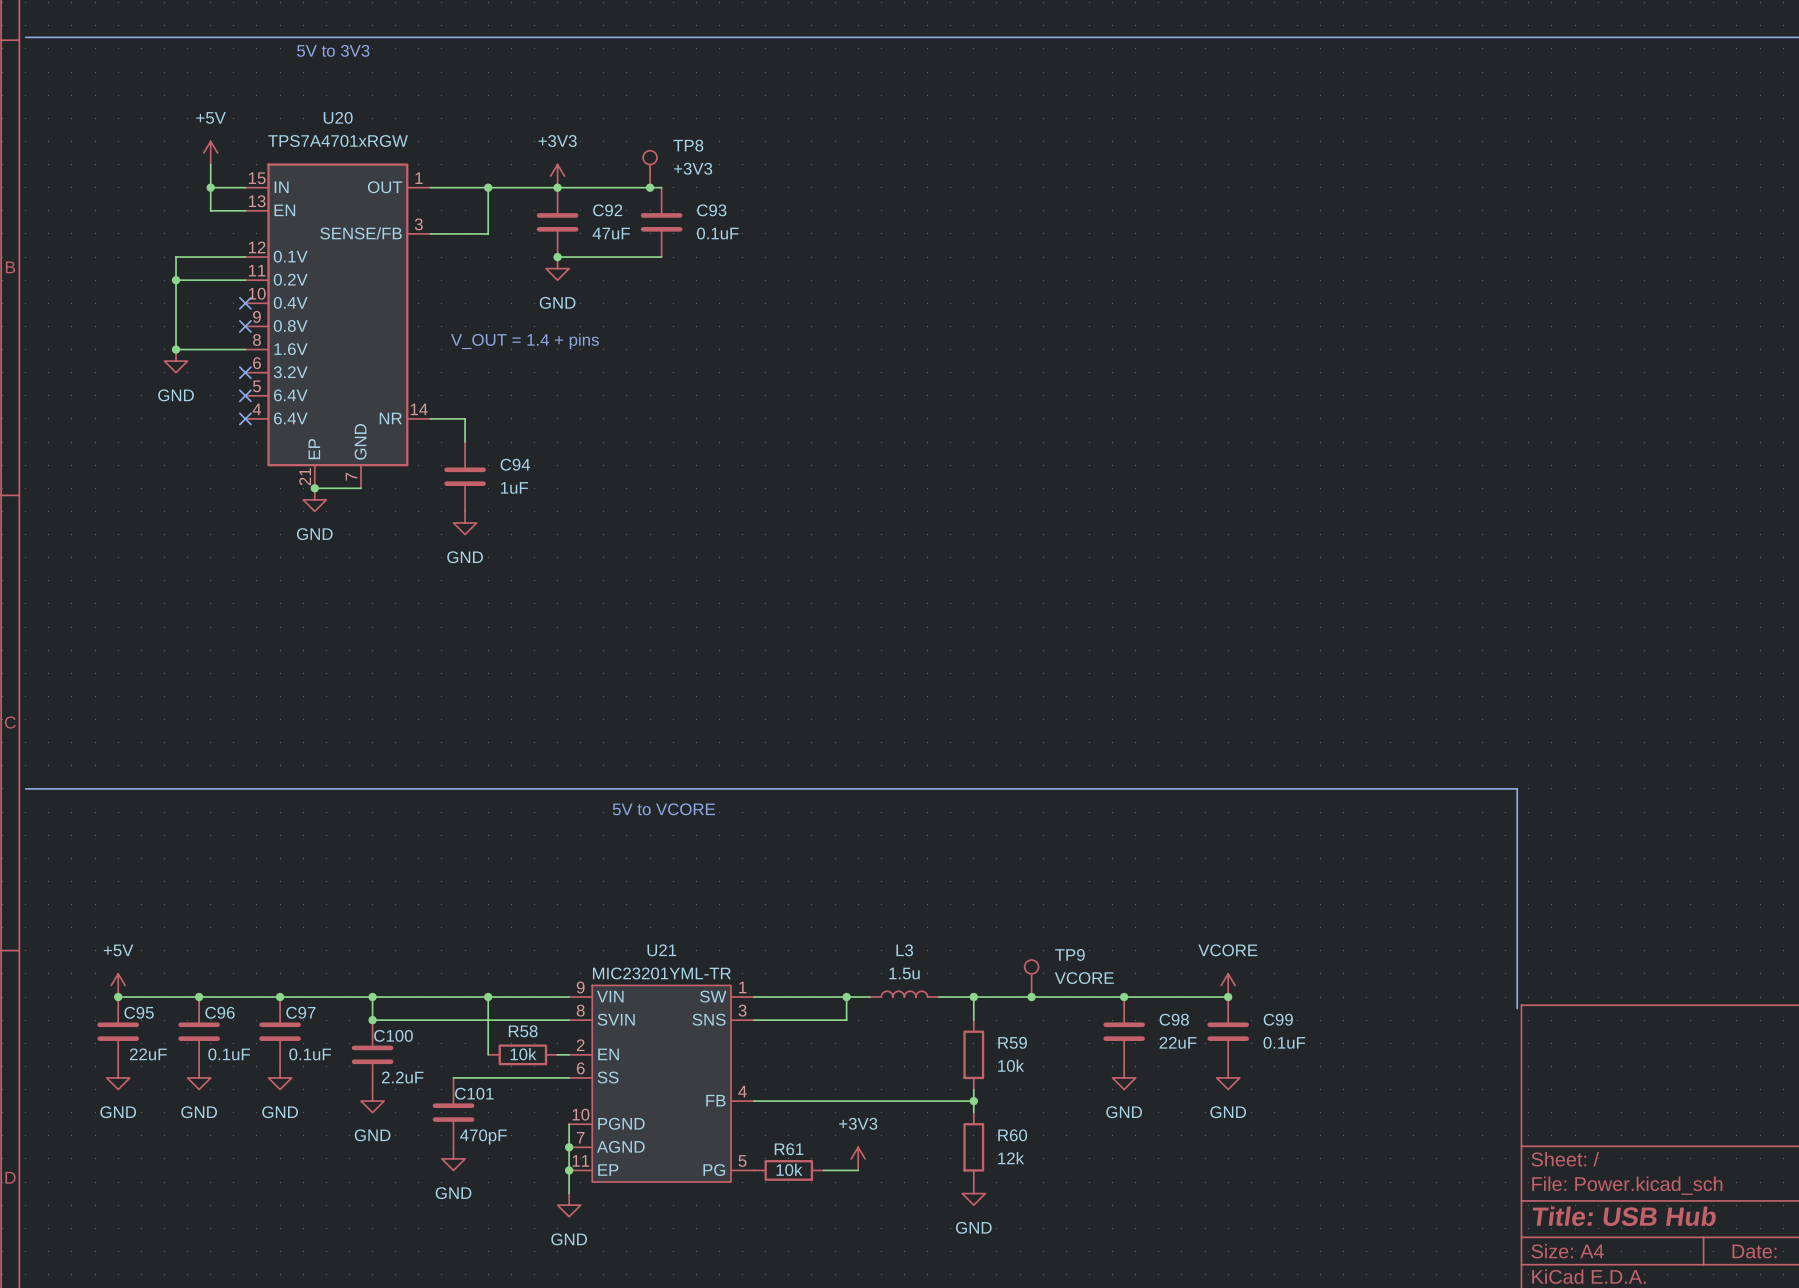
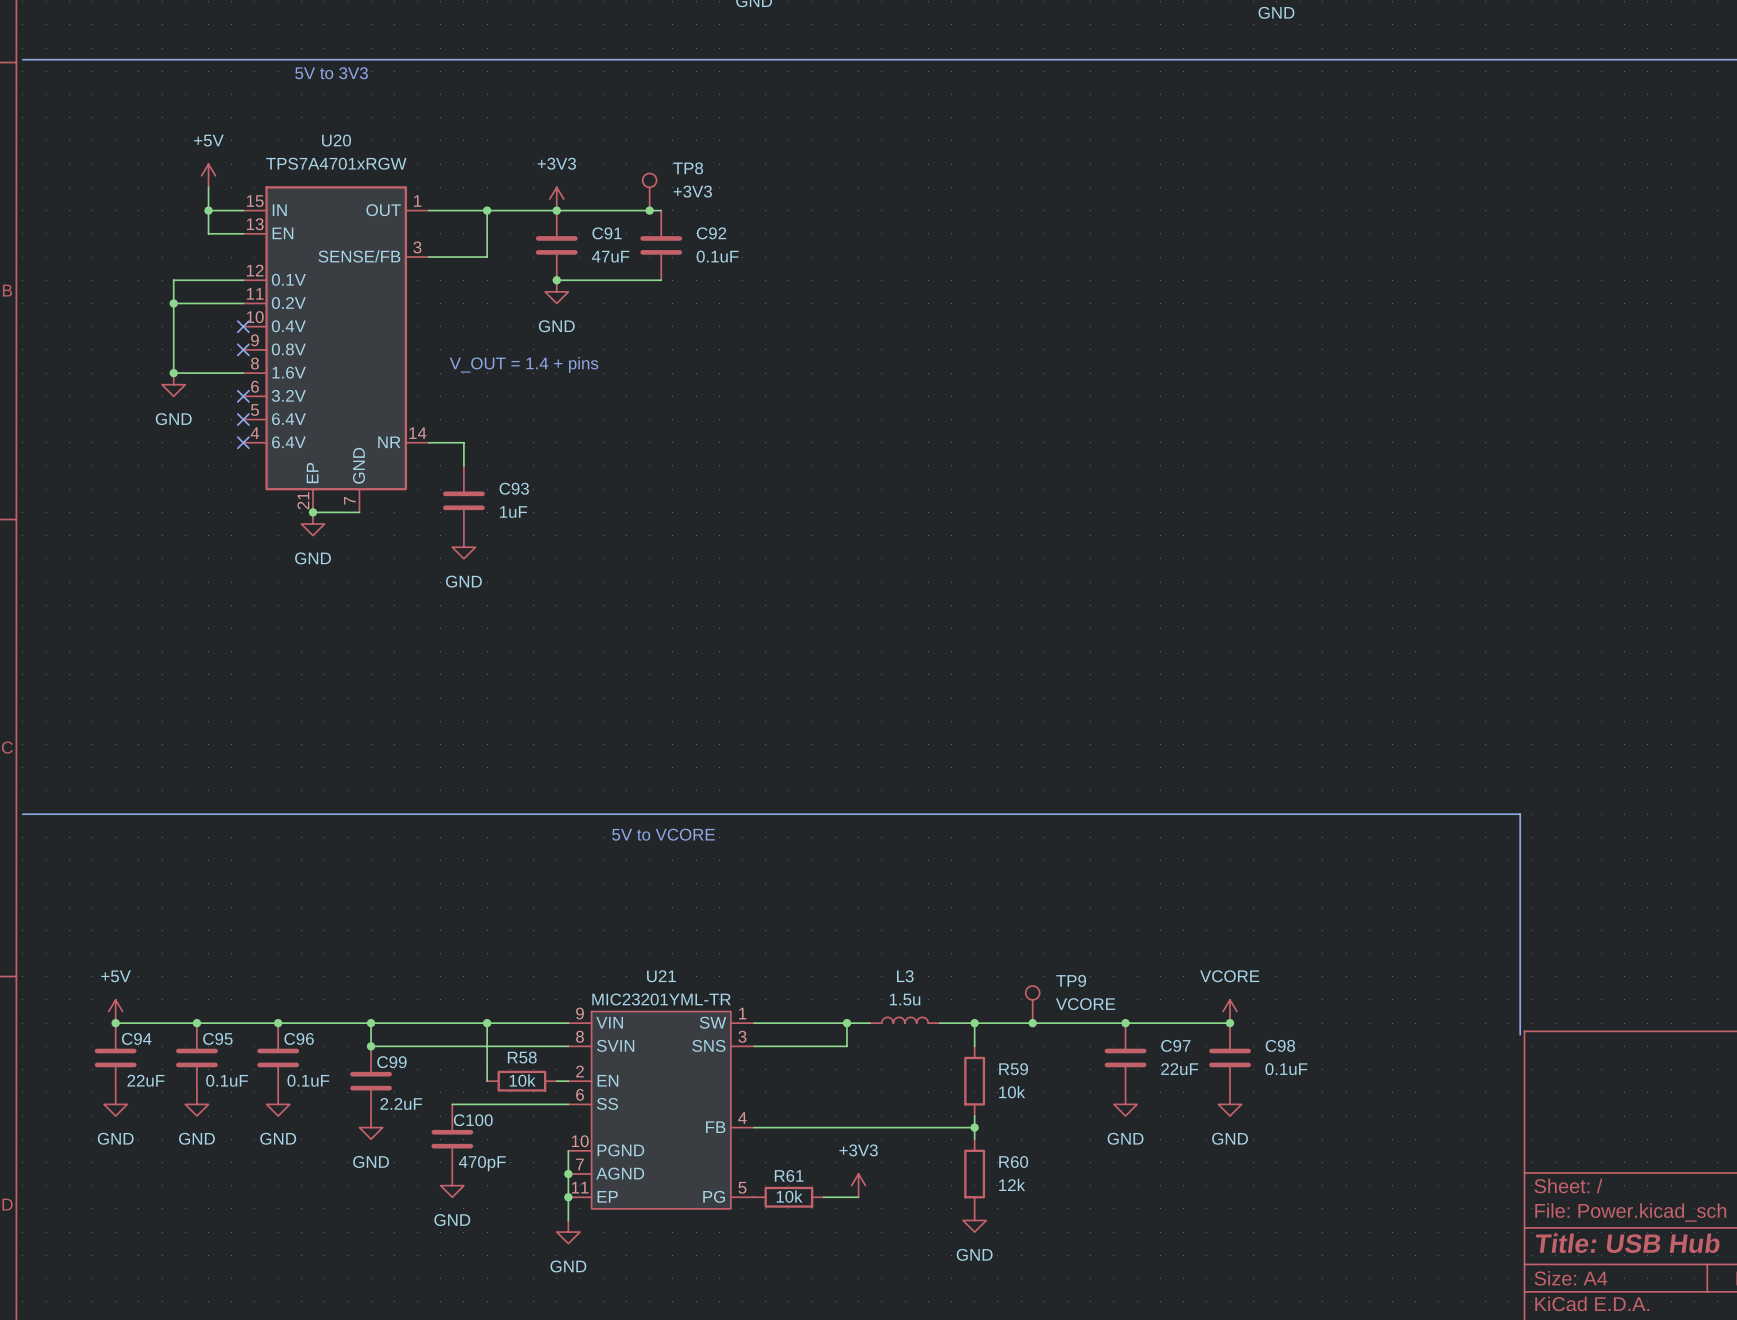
C92 name: C92 (607, 210) -> C91 (607, 233)
C93 name: C93 (711, 210) -> C92 (711, 233)
C94 name: C94 (515, 464) -> C93 (514, 488)
C95 name: C95 (139, 1012) -> C94 (136, 1038)
C96 name: C96 (220, 1012) -> C95 (217, 1038)
C97 name: C97 (300, 1012) -> C96 (299, 1038)
C98 name: C98 (1174, 1019) -> C97 (1175, 1045)
C99 name: C99 (1278, 1019) -> C98 (1280, 1045)
C100 name: C100 (393, 1035) -> C99 (391, 1062)
C101 name: C101 (474, 1093) -> C100 (473, 1120)

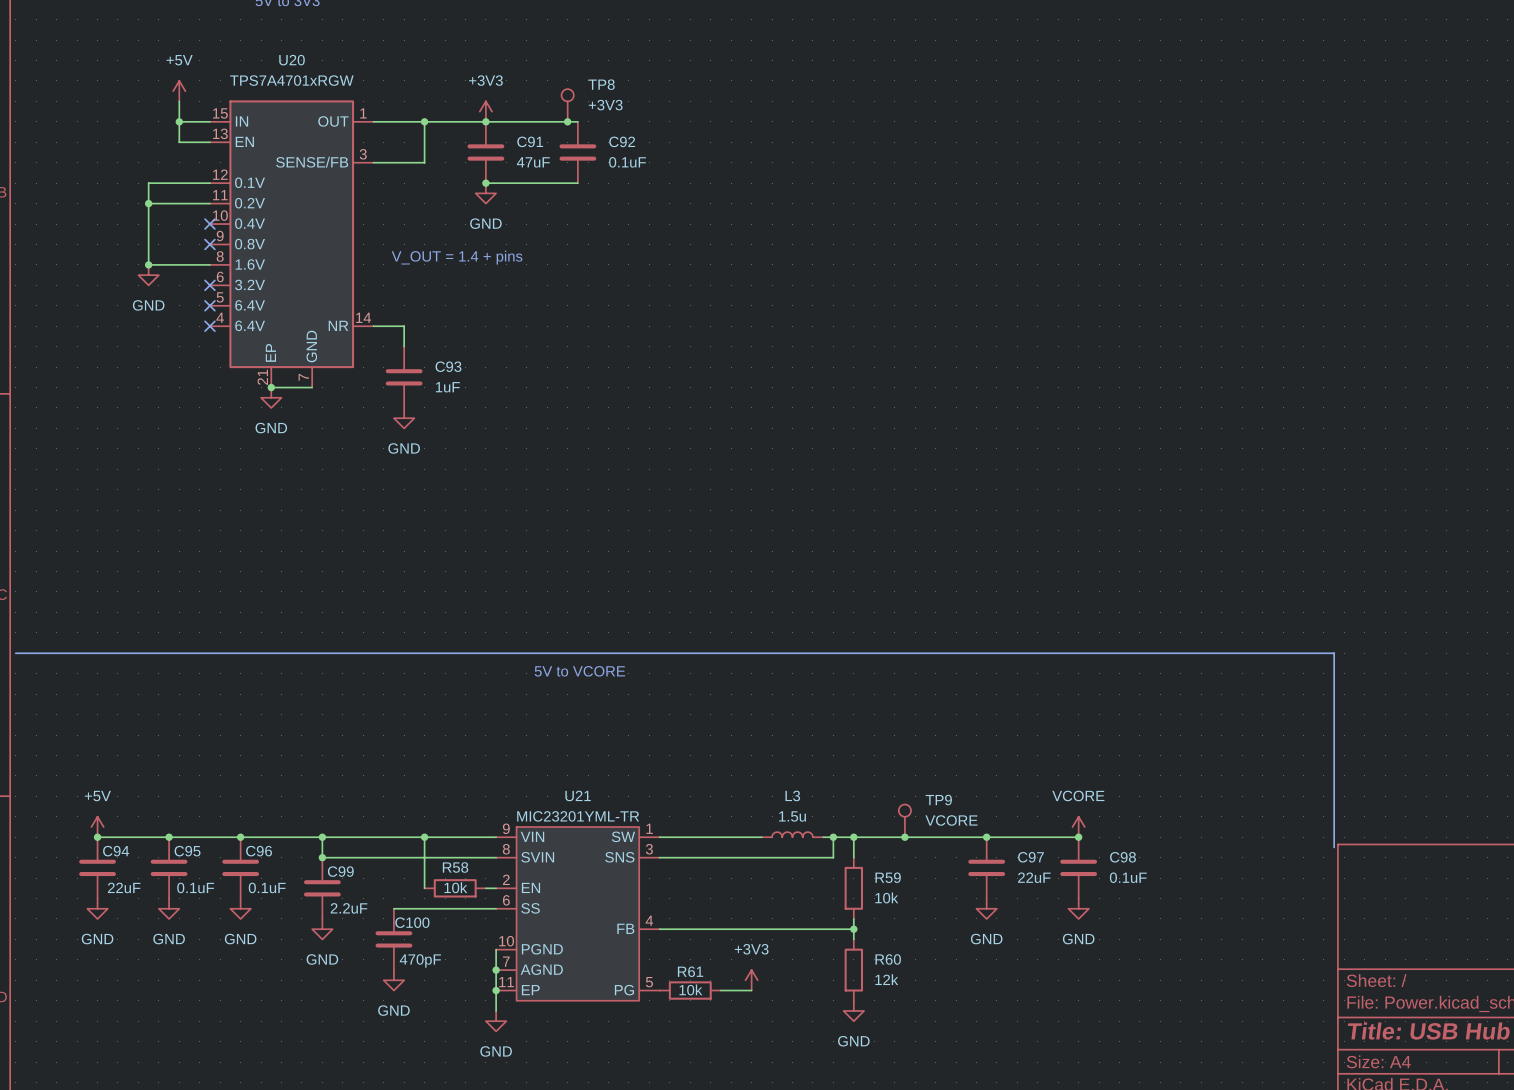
wire: (846, 1023) (846, 1046) -> (833, 837) (833, 857) (741, 857)
junction: (846, 1023) -> none
junction: none -> (833, 837)

